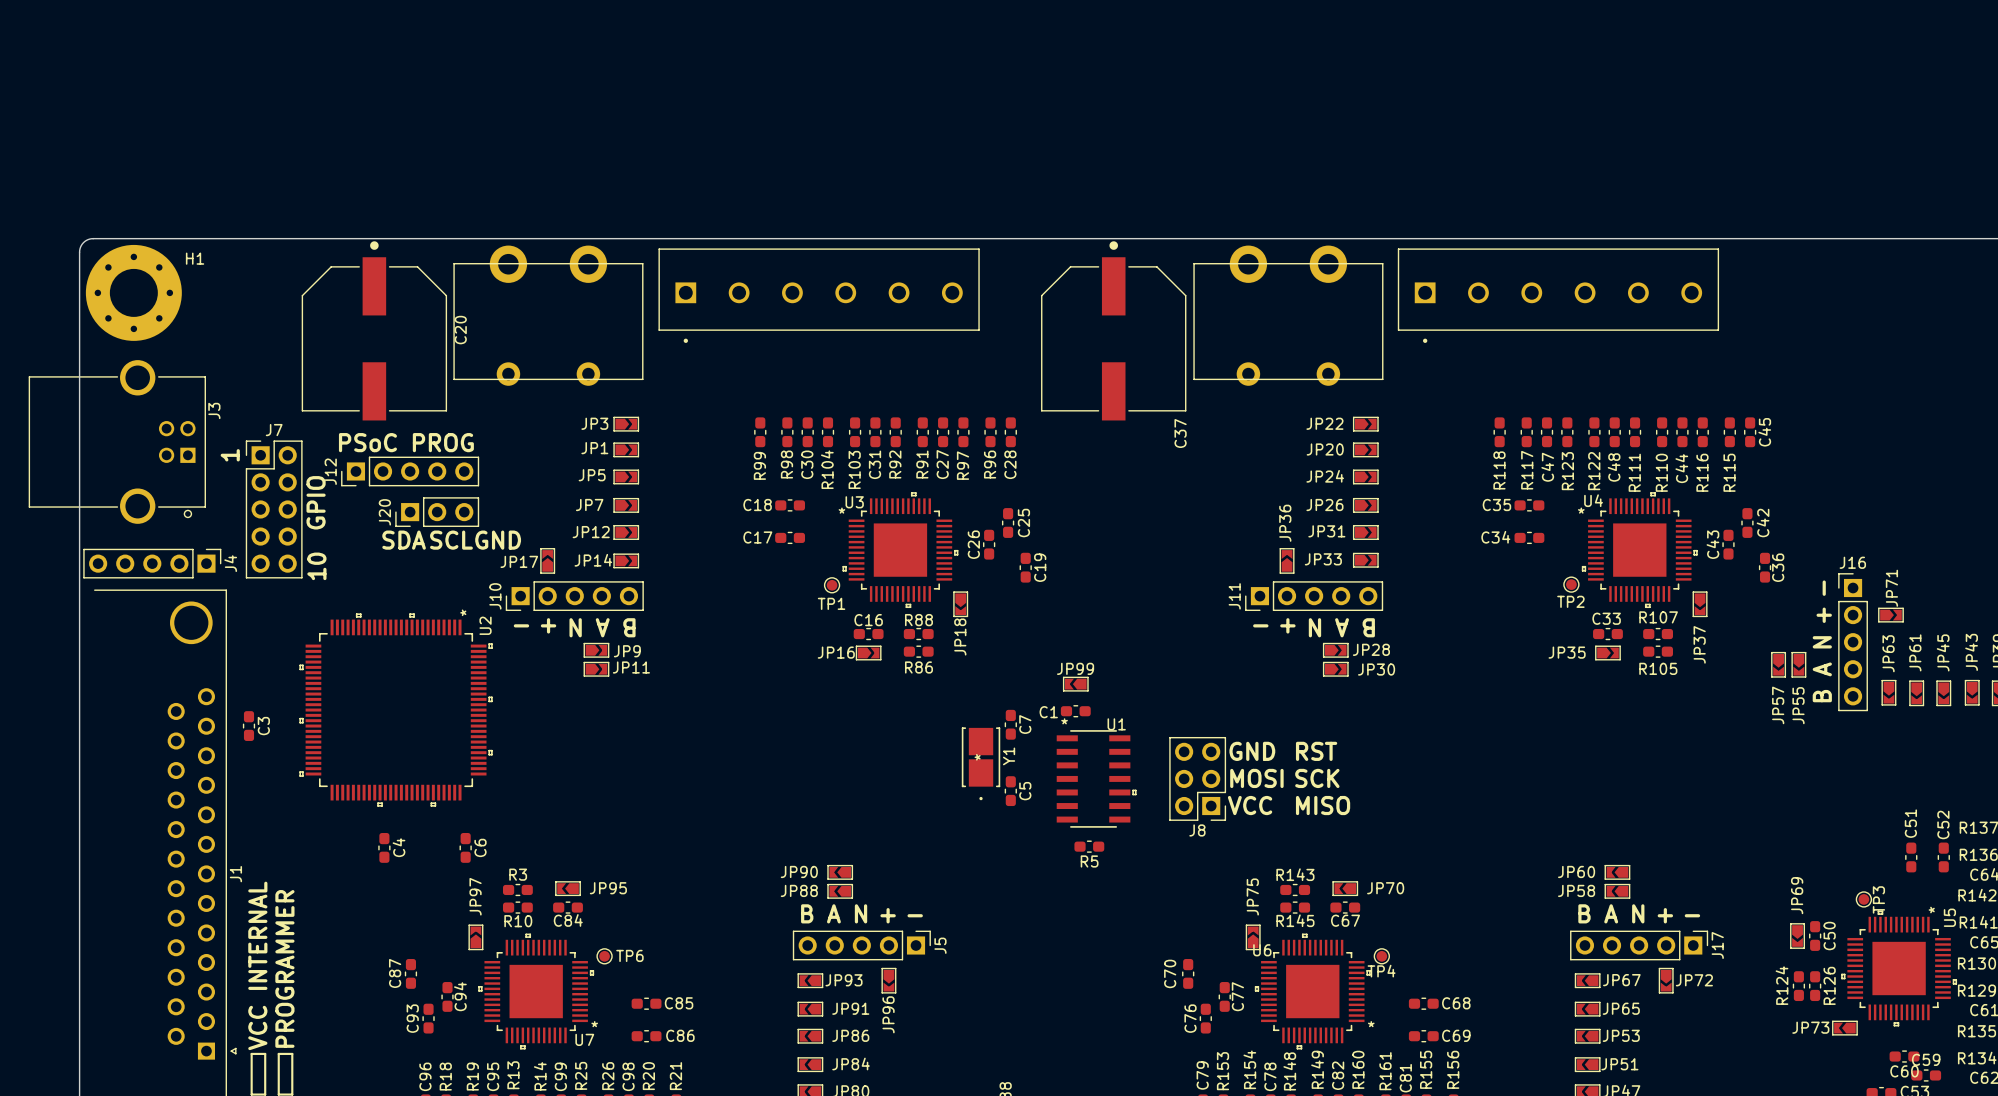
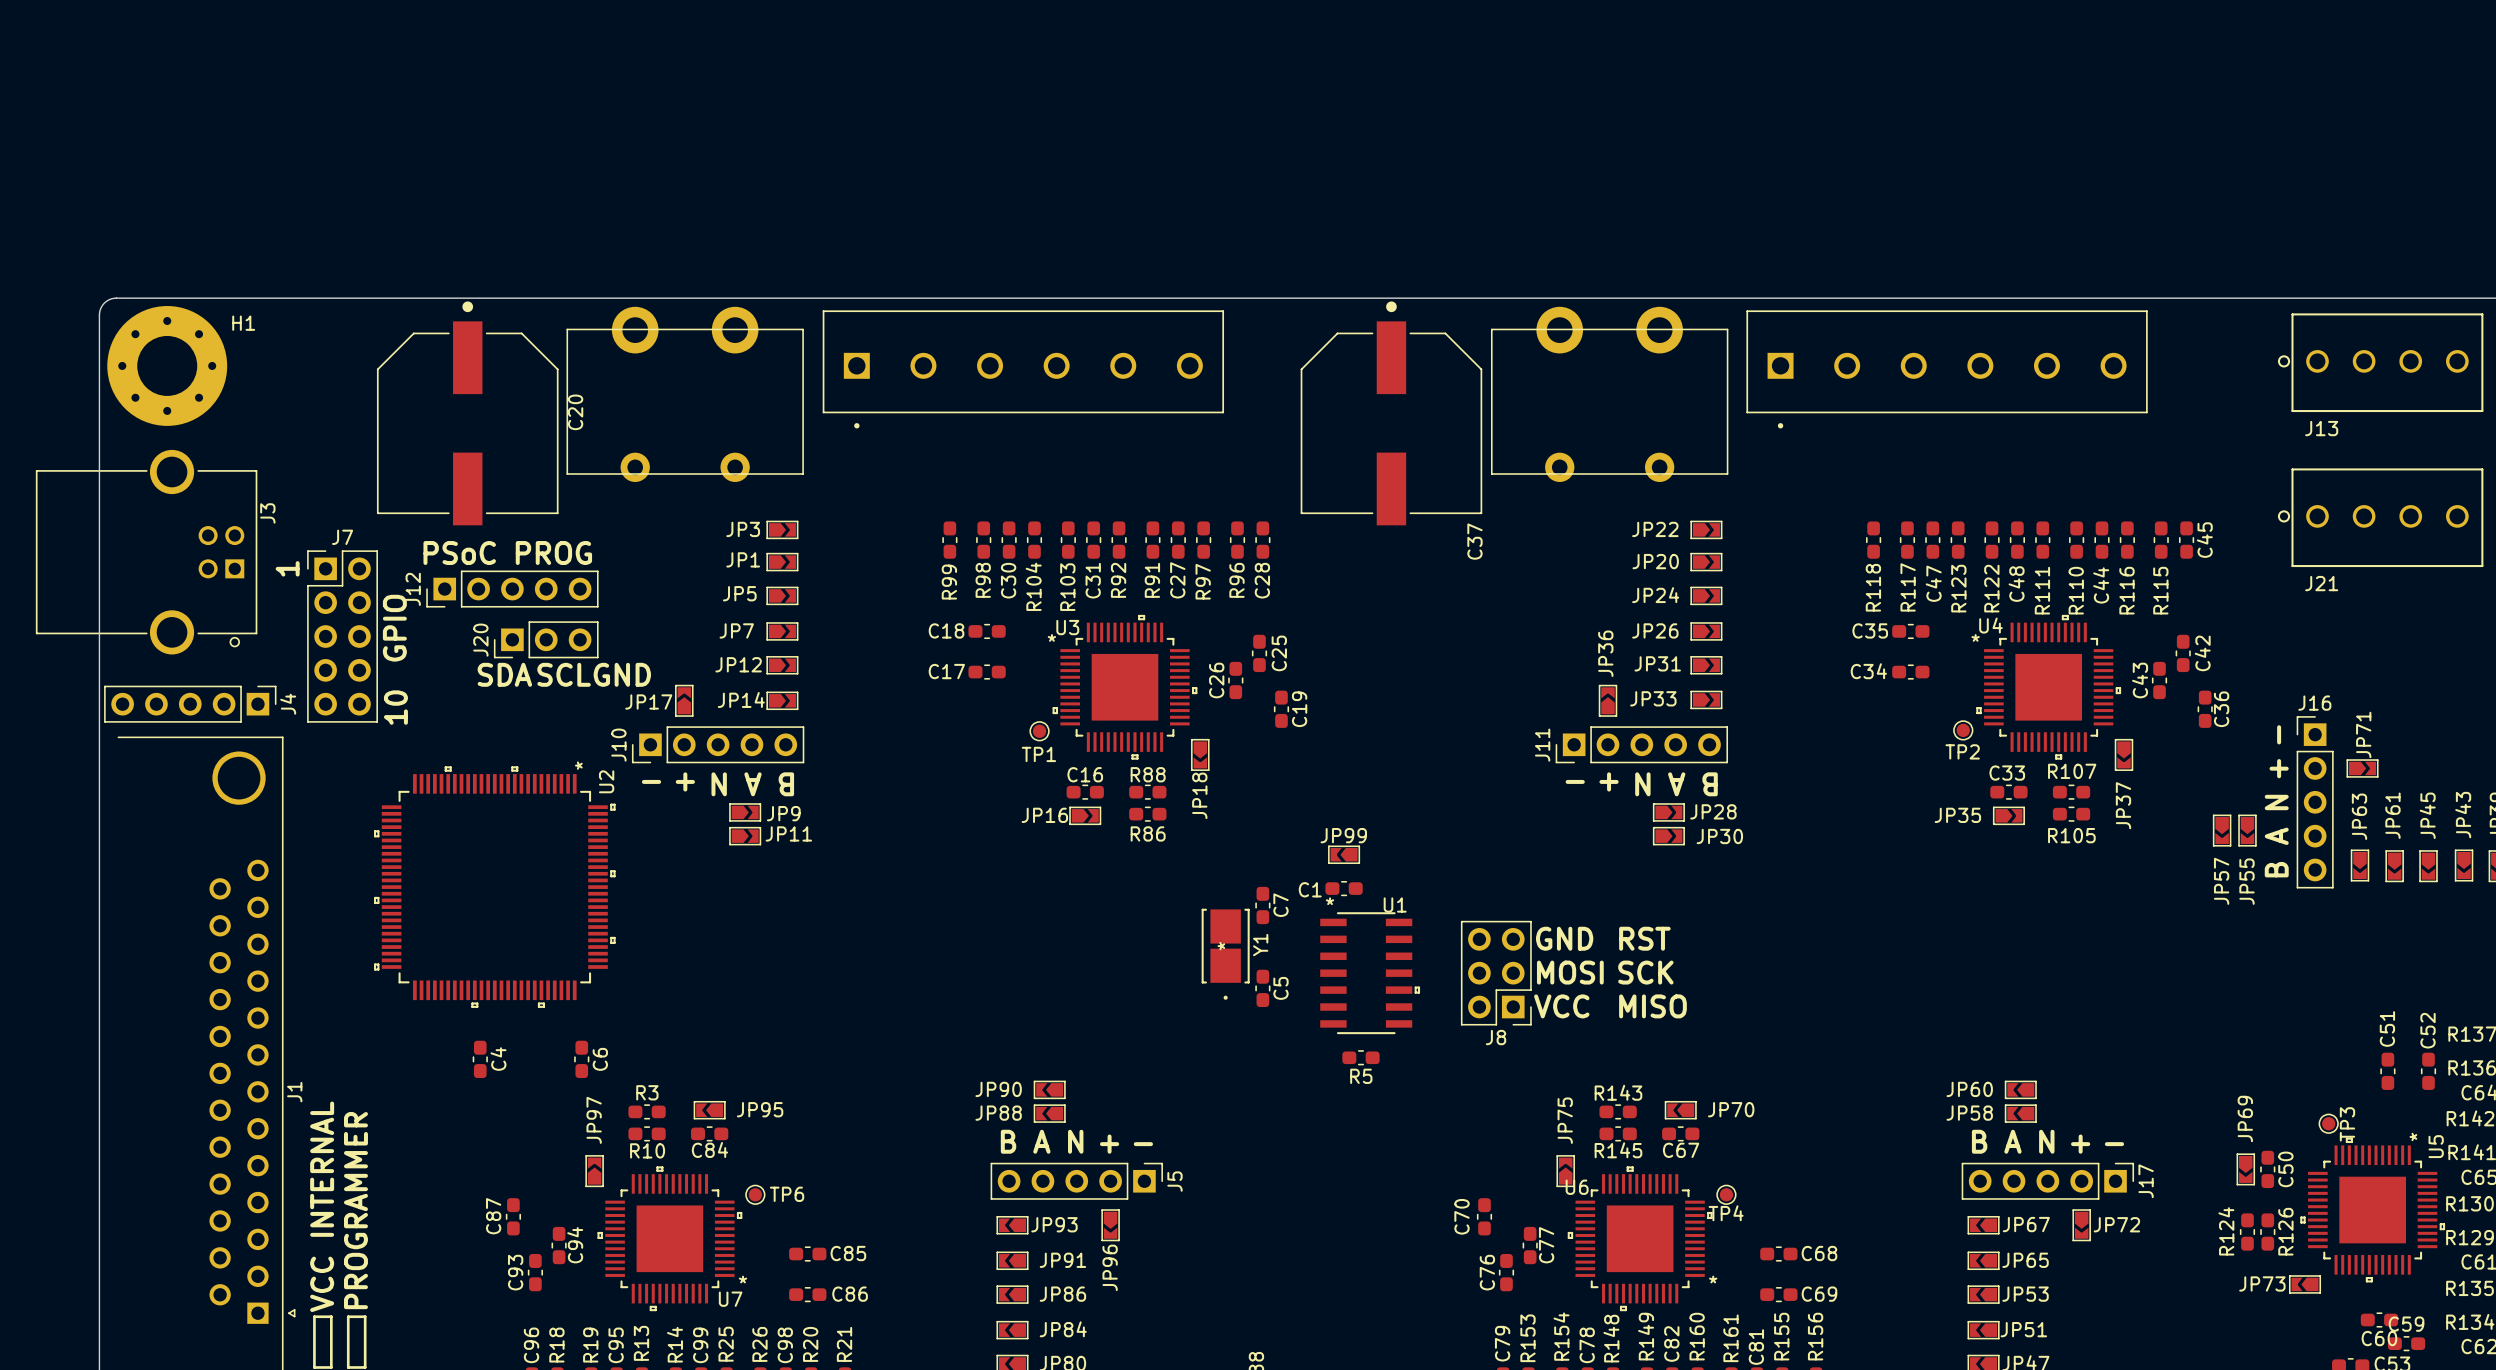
J13: none -> (2380, 362)
J21: none -> (2380, 517)
C3: (248, 726) -> none

